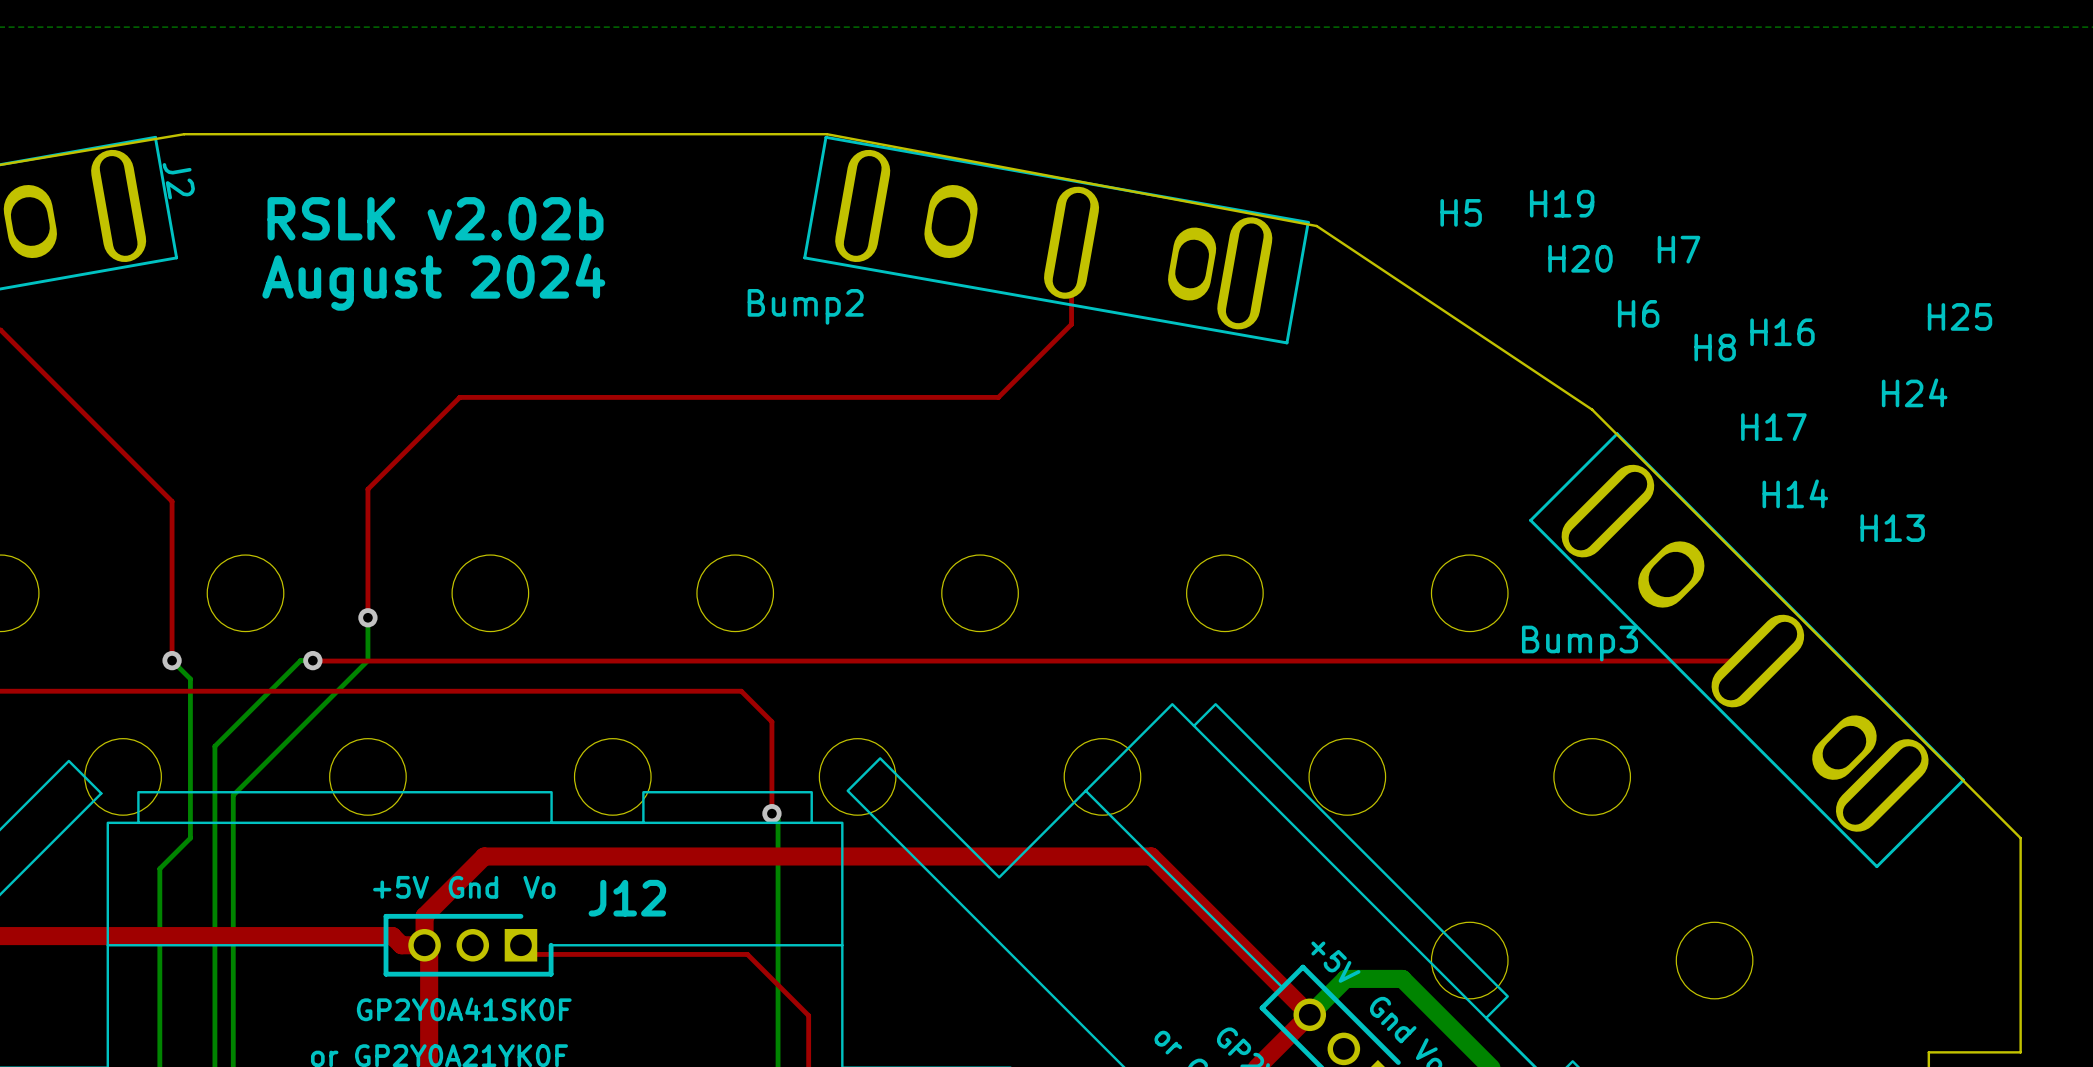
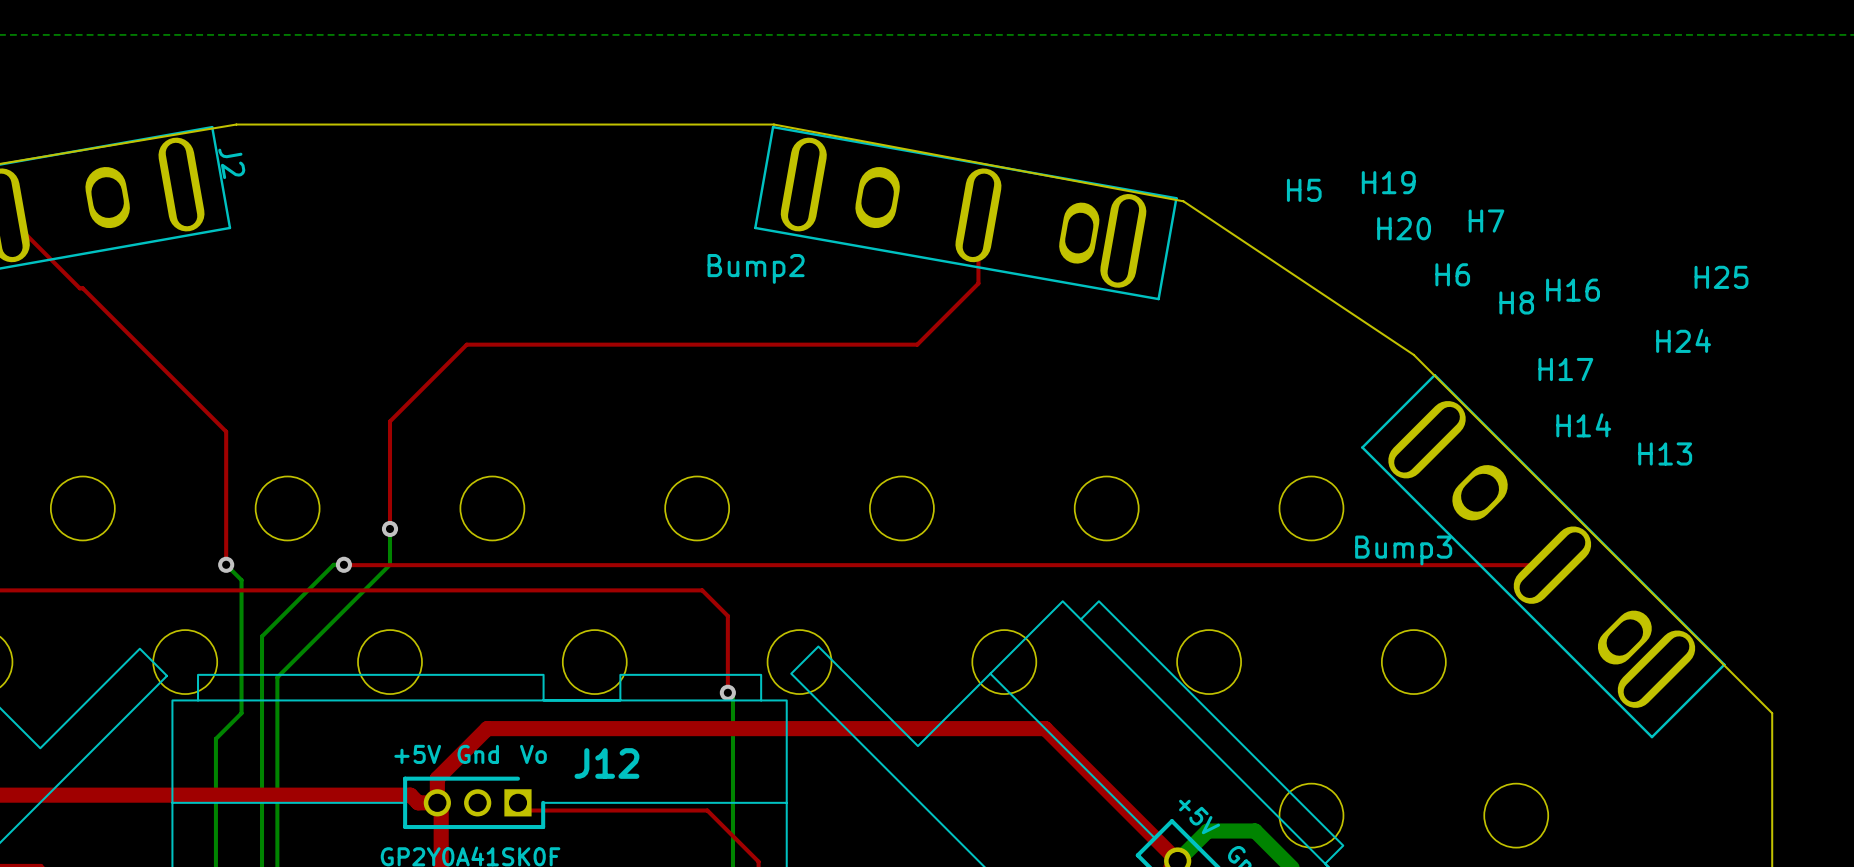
text: RSLK v2.02b (435, 218) -> none
text: August 2024 (433, 282) -> none

